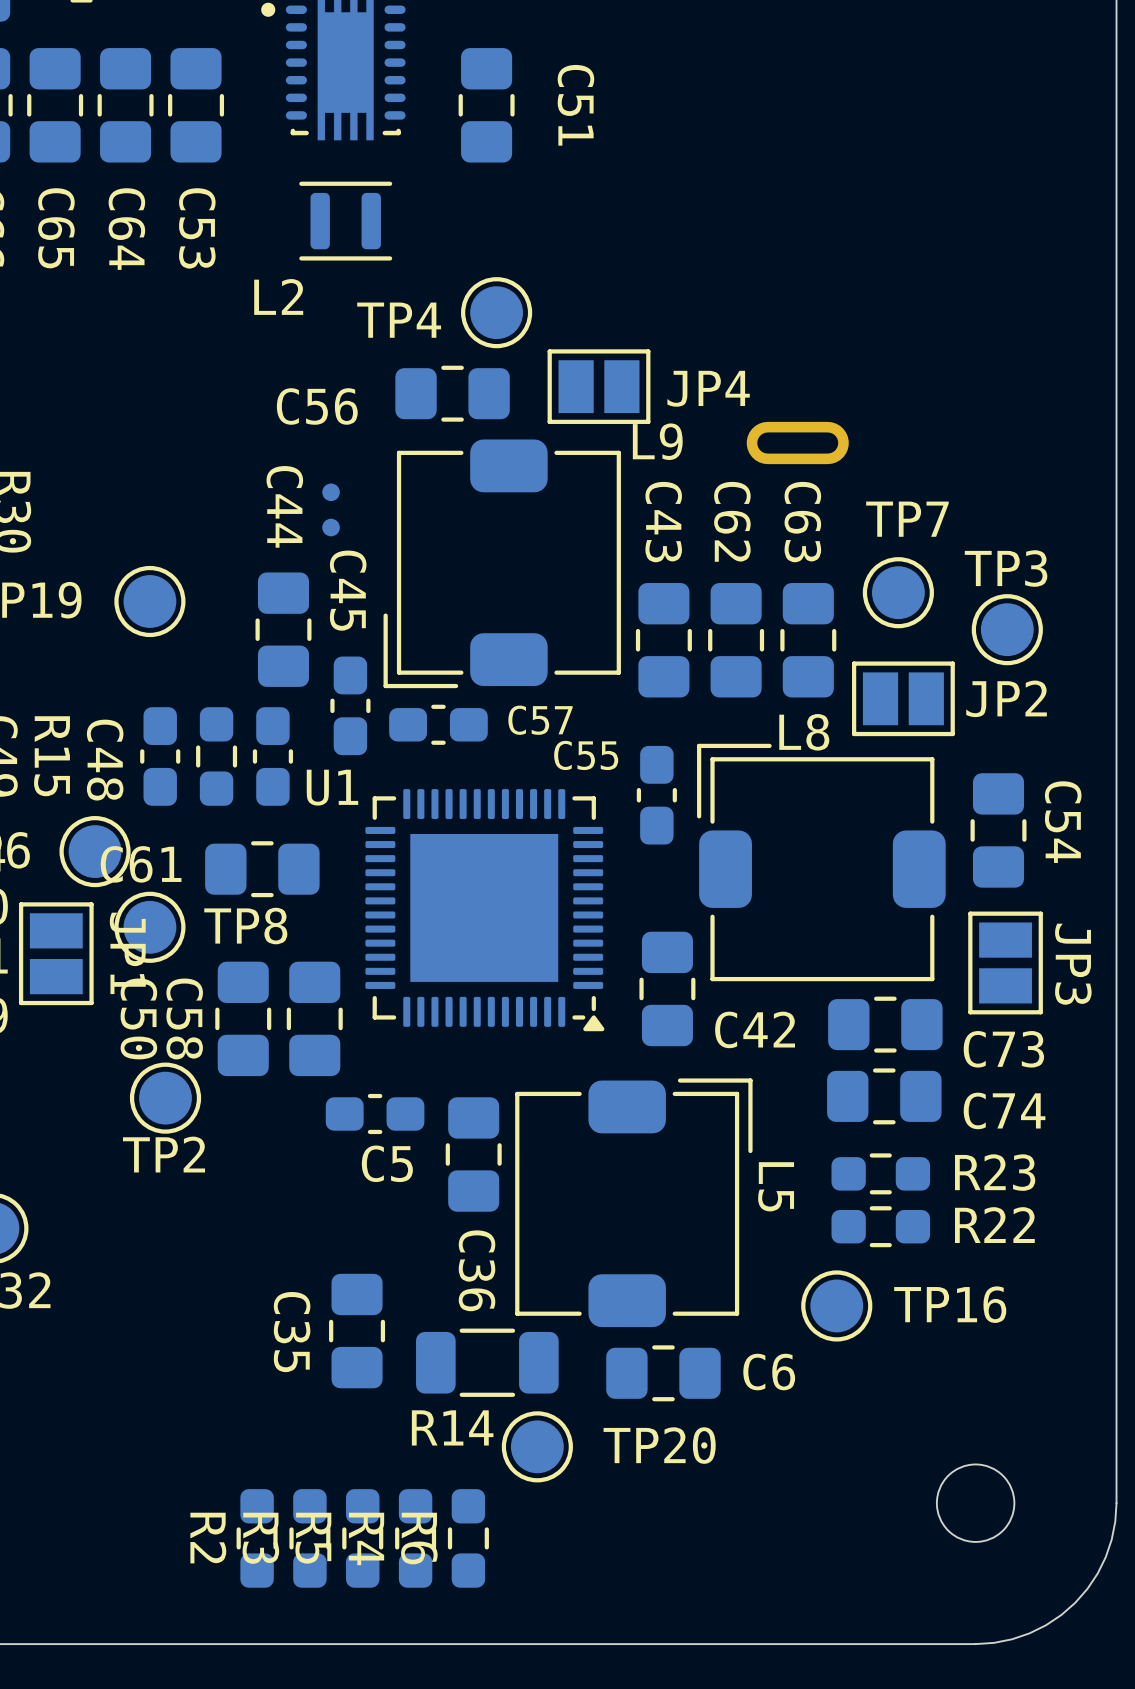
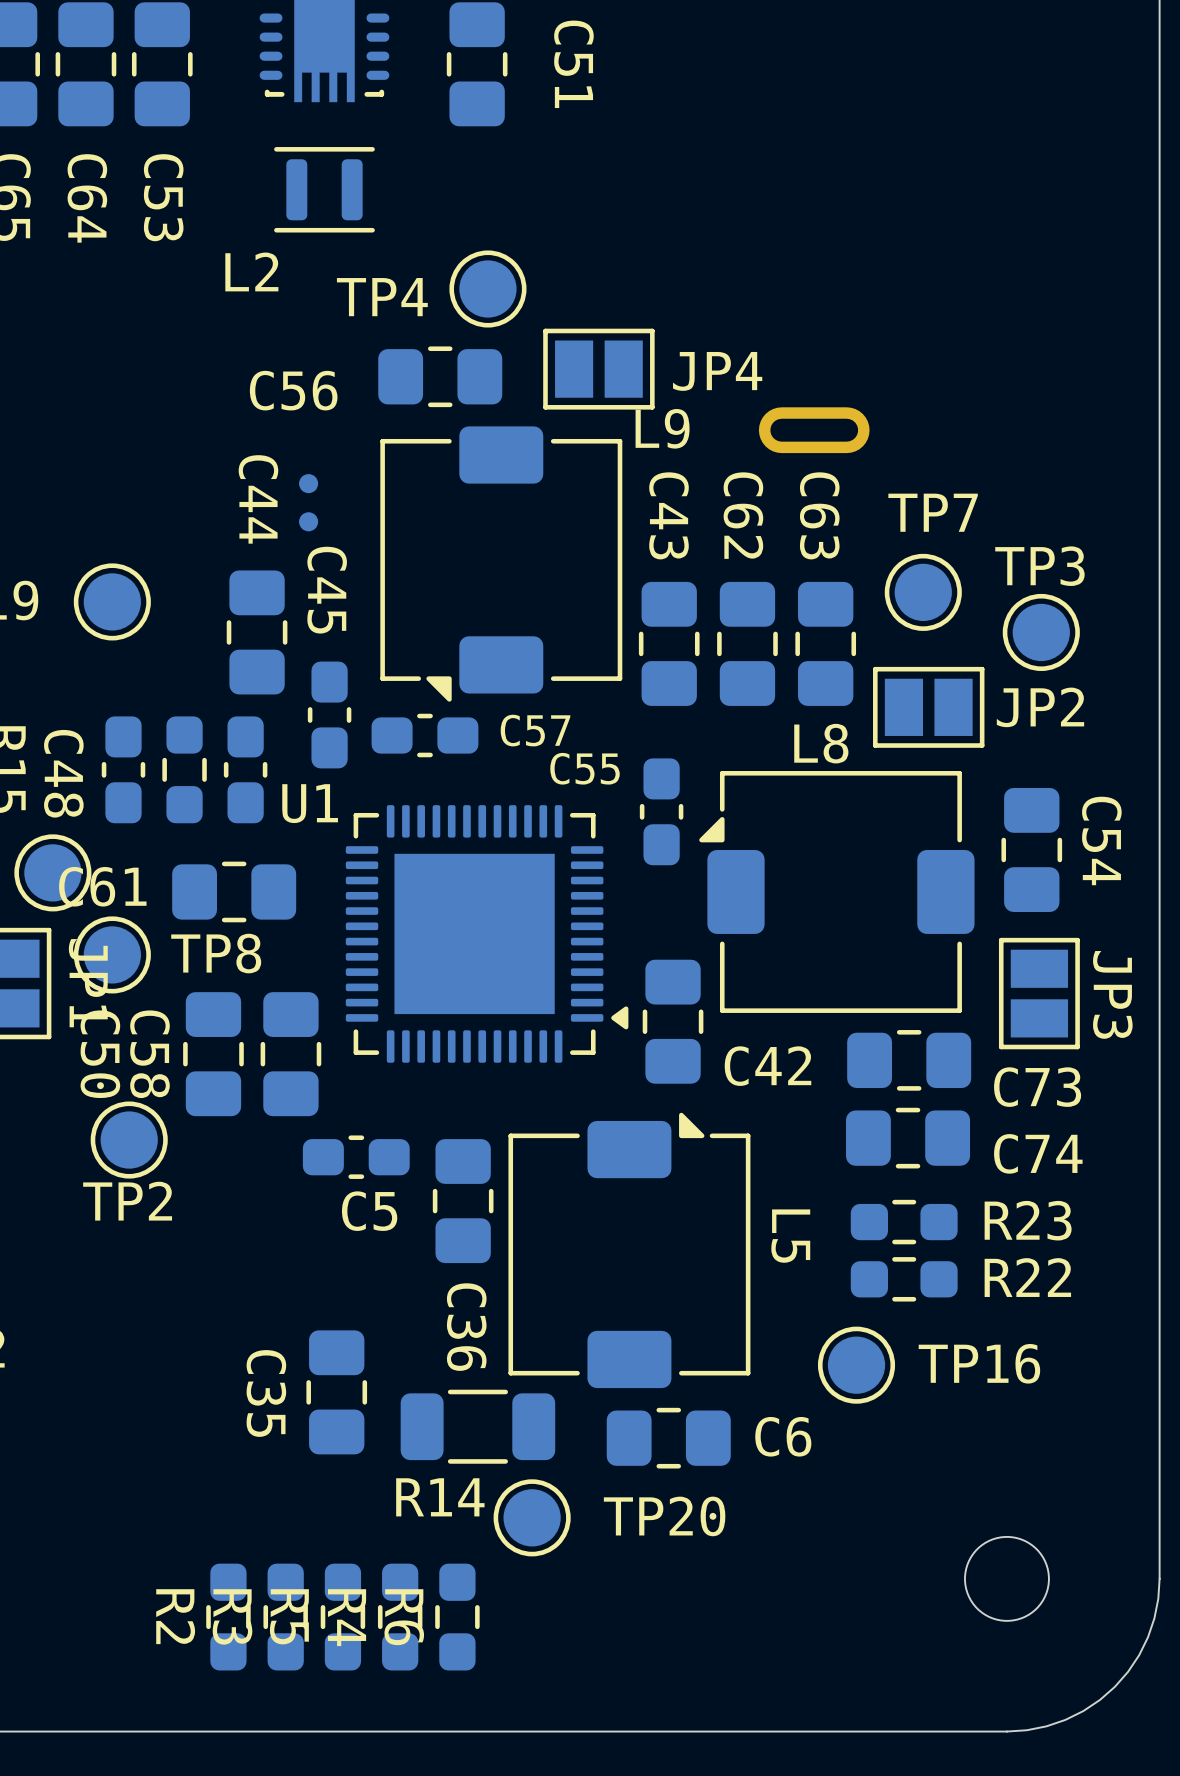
L9 footprint: [383, 439, 621, 689] -> [380, 426, 623, 702]
L8 footprint: [697, 743, 946, 982] -> [699, 770, 975, 1013]
U1 footprint: [365, 789, 605, 1032] -> [345, 805, 629, 1063]
L5 footprint: [515, 1078, 753, 1328] -> [508, 1112, 751, 1389]

